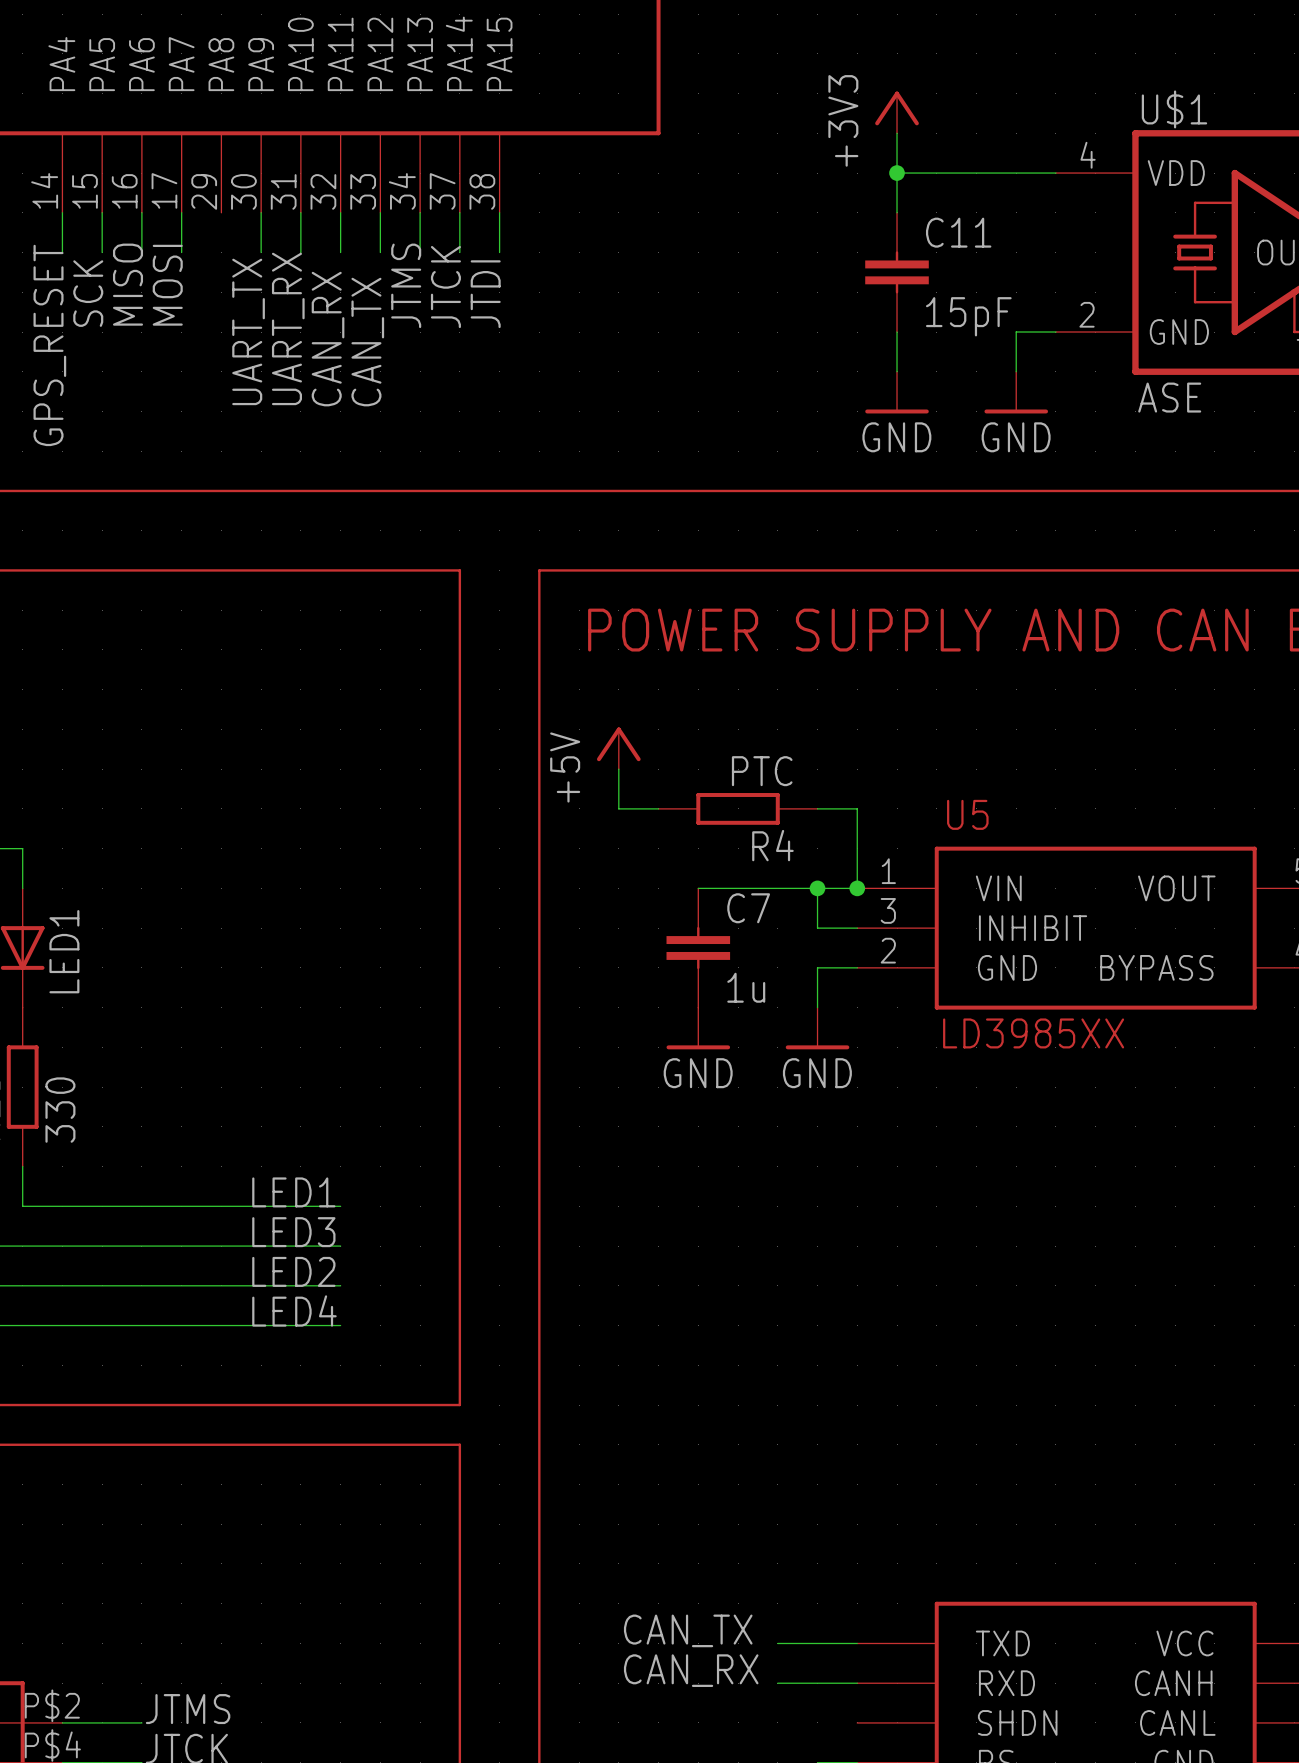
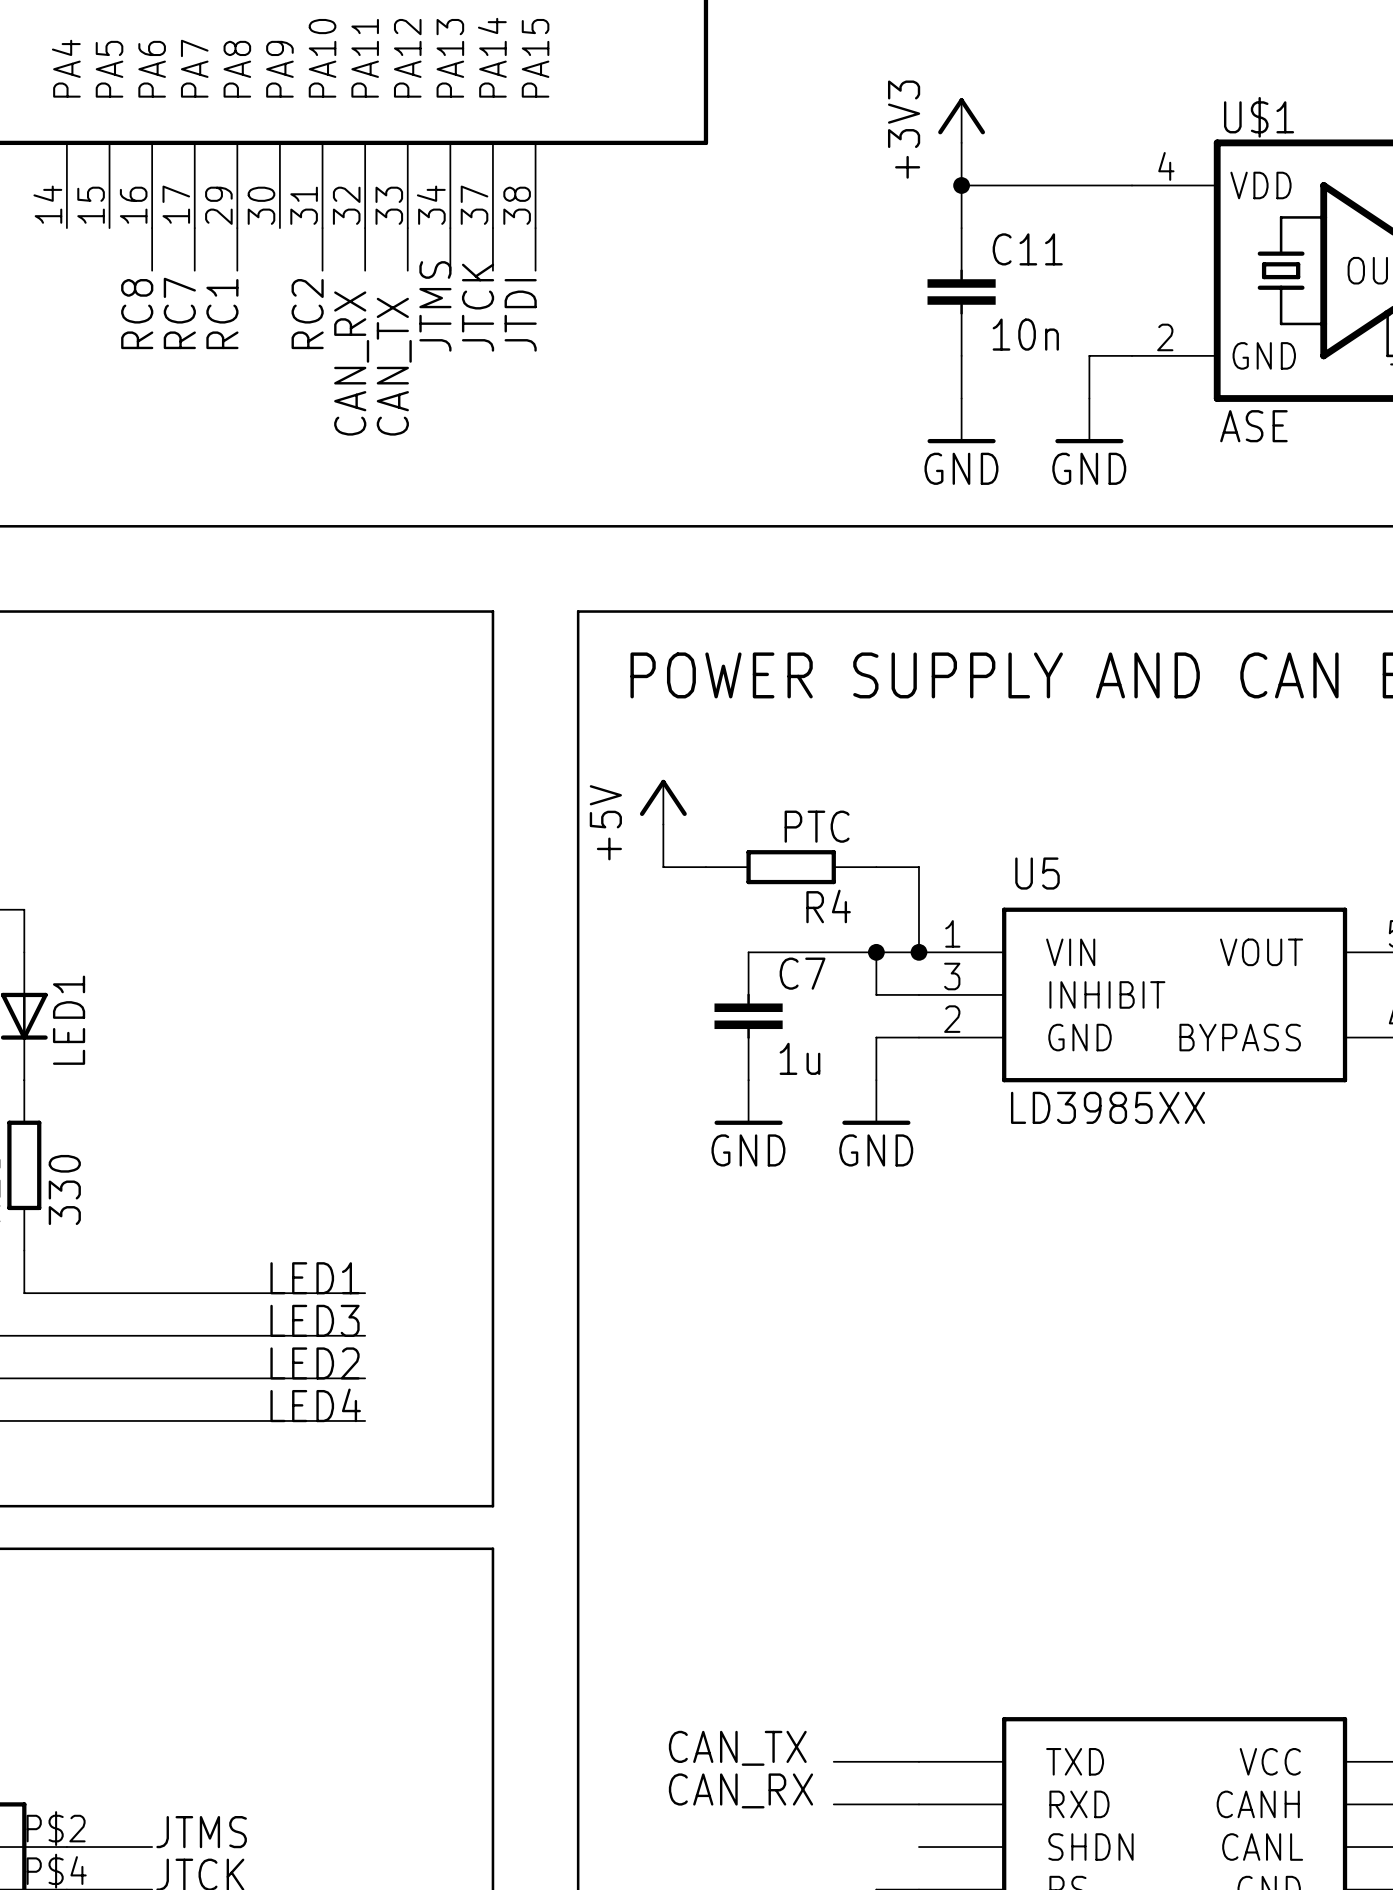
wire: (62, 212) (62, 252) -> none
wire: (102, 212) (102, 252) -> none
wire: (261, 212) (261, 252) -> (237, 228) (237, 270)
label: MISO (128, 284) -> RC8 (137, 314)
label: MOSI (167, 285) -> RC7 (179, 313)
label: none -> RC1 (222, 314)
label: none -> RC2 (307, 314)
label: SCK (88, 293) -> none
C11 value: 15pF (968, 316) -> 10n (1025, 334)
label: UART_RX (288, 328) -> none
label: UART_TX (248, 331) -> none
label: GPS_RESET (49, 345) -> none

